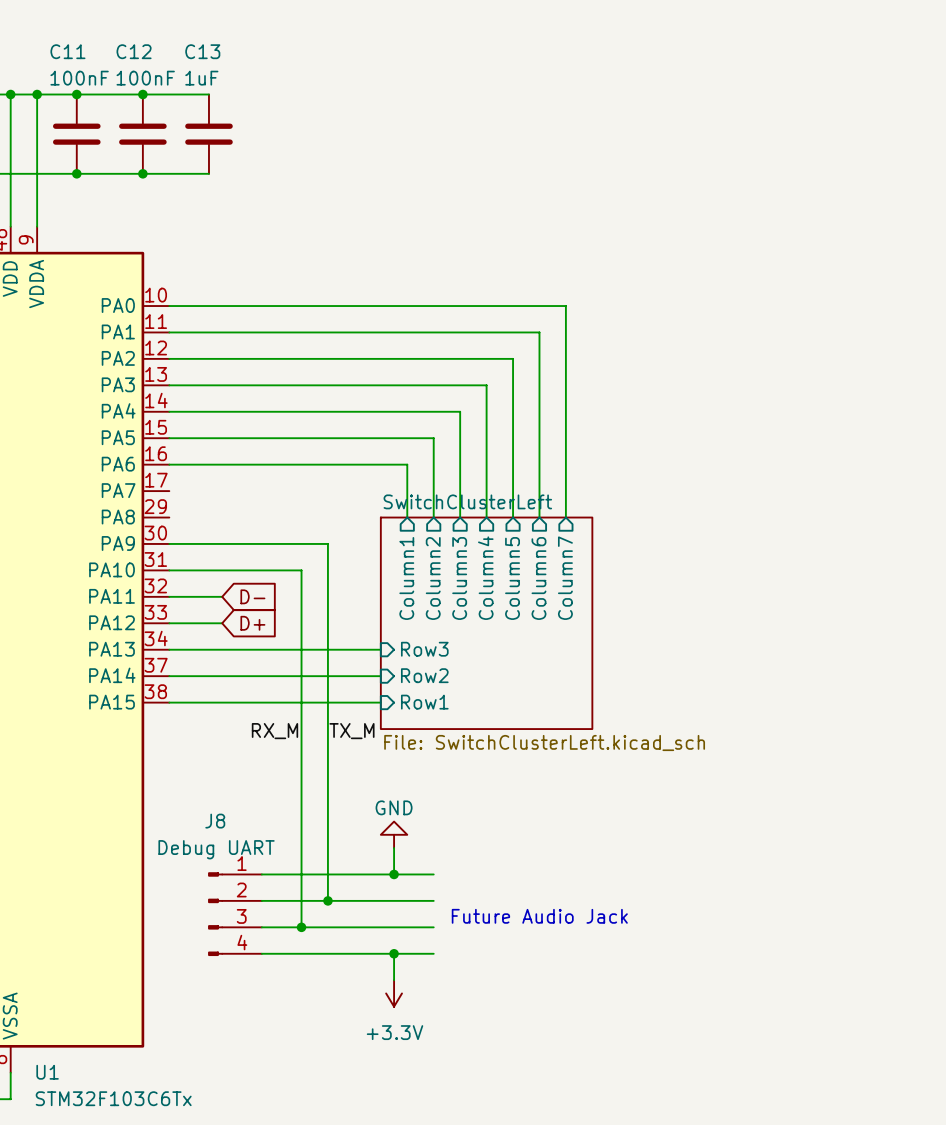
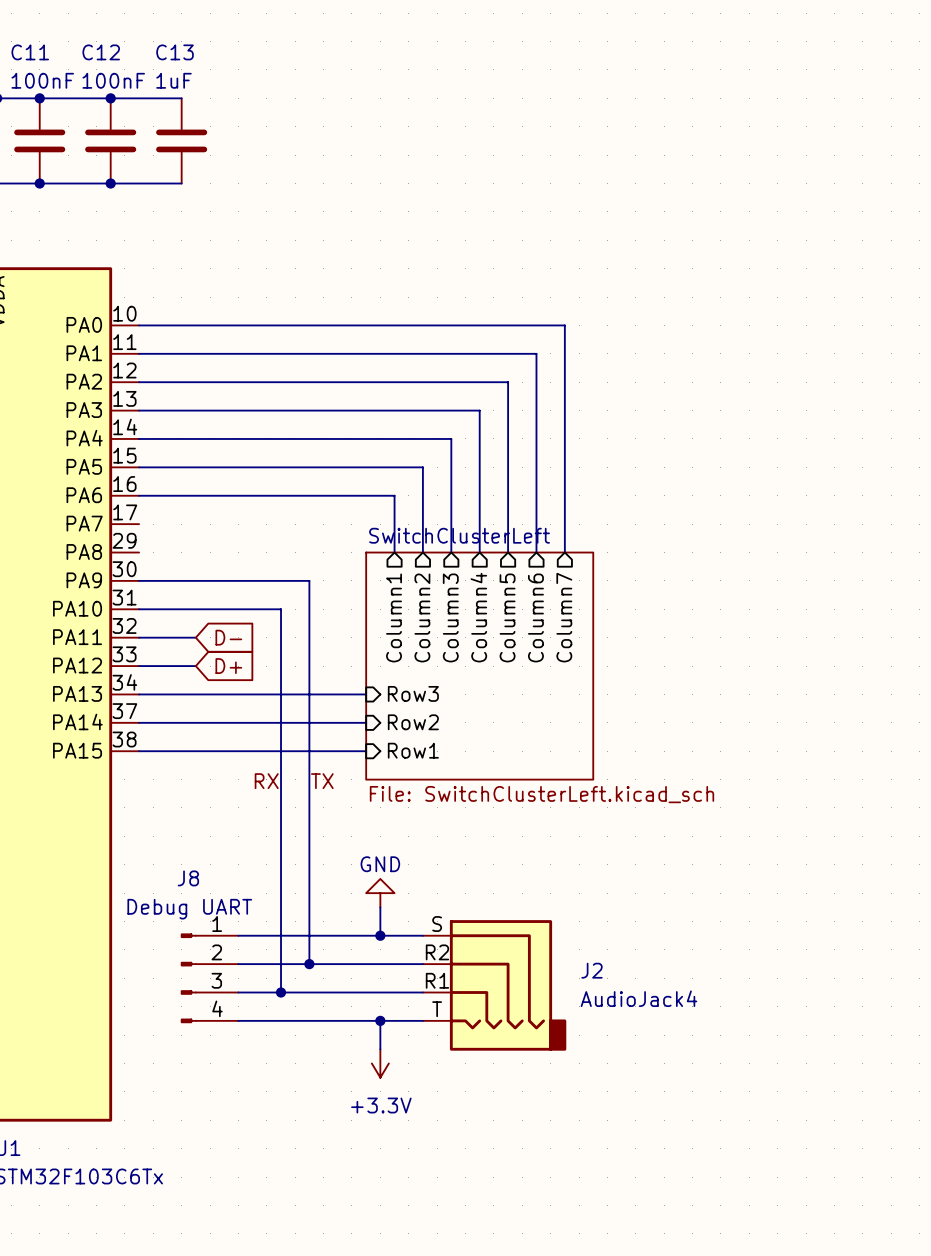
label: RX_M (274, 731) -> RX (266, 781)
label: TX_M (351, 731) -> TX (322, 781)
text: Future Audio Jack (539, 916) -> none
J2: none -> AudioJack4 (494, 985)

